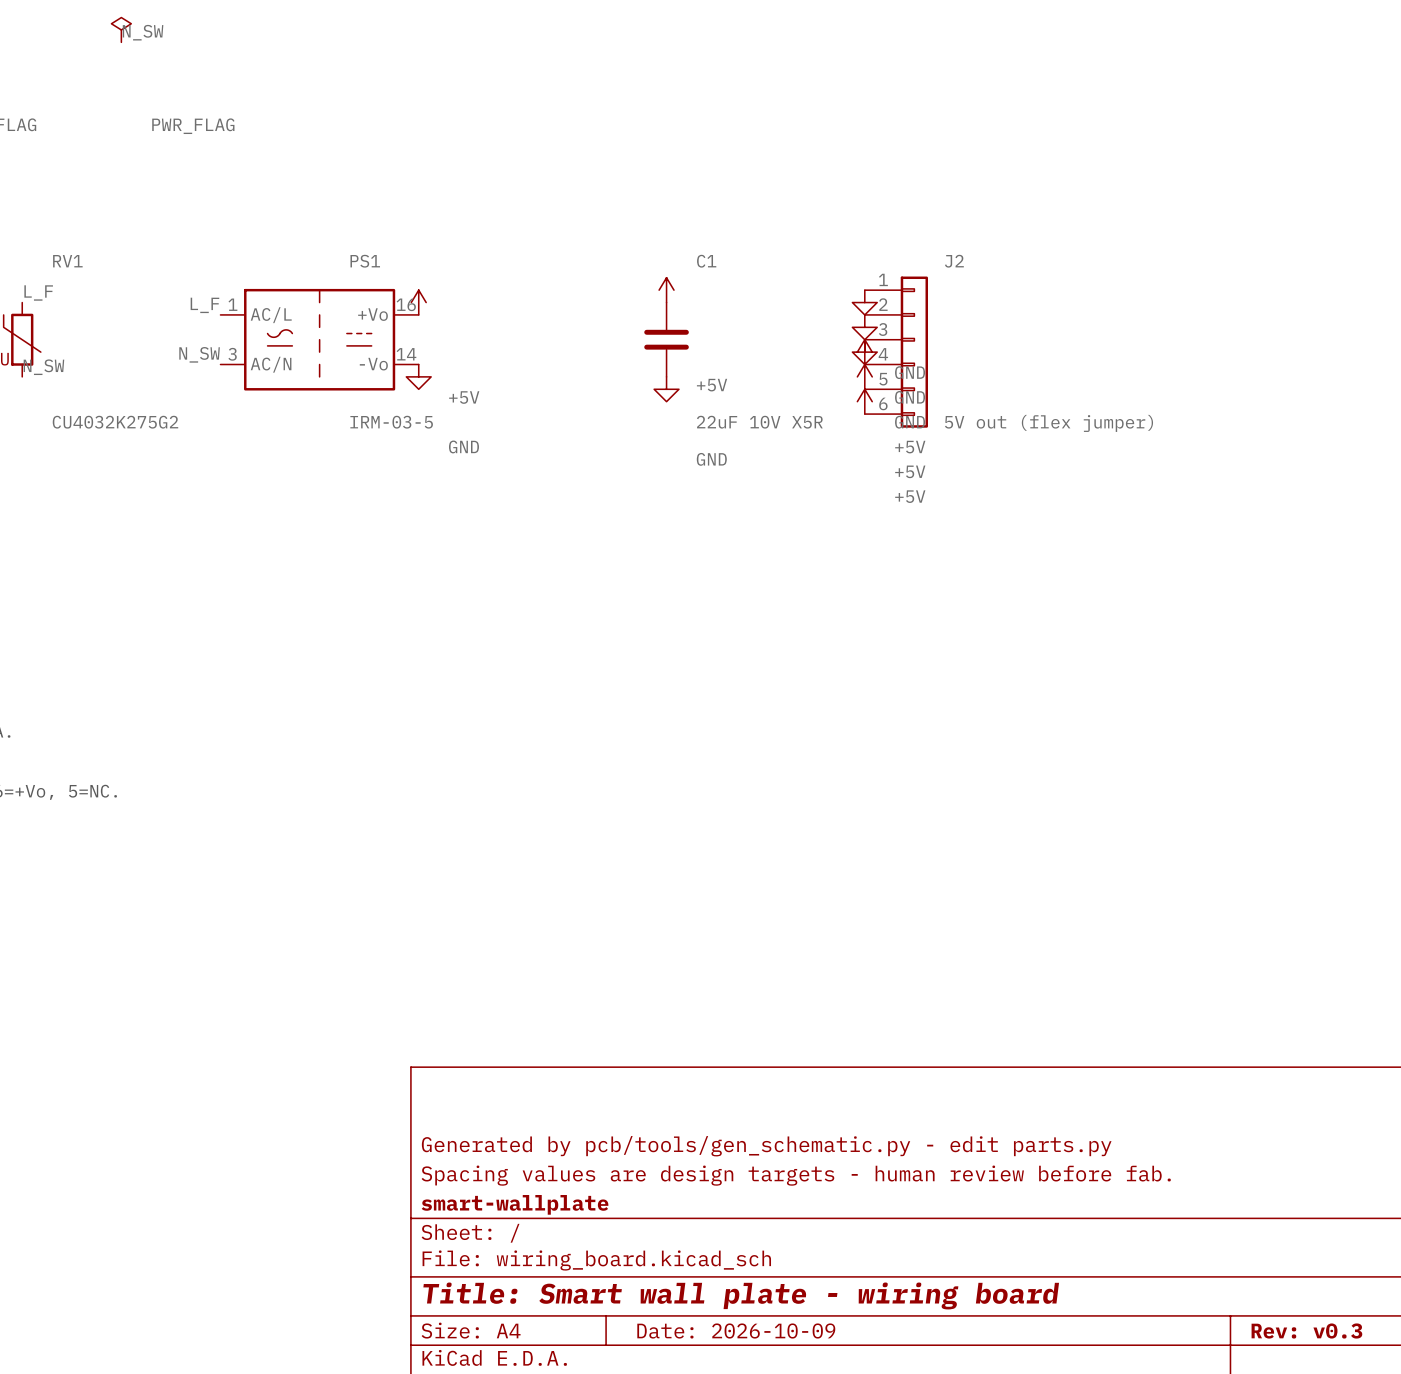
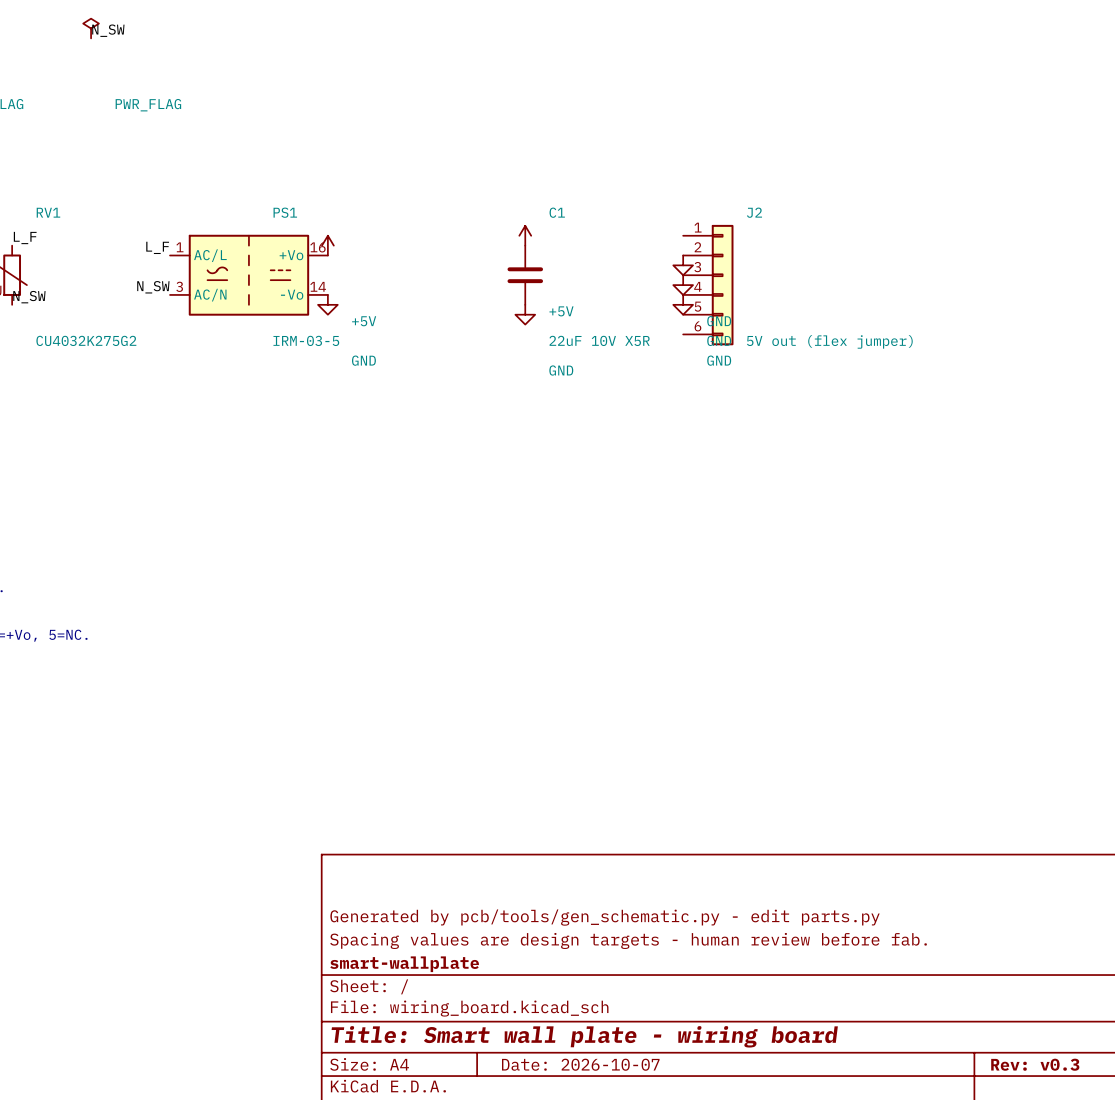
power symbol: GND (864, 302) -> none
power symbol: +5V (864, 352) -> none
power symbol: +5V (864, 376) -> GND (683, 304)
power symbol: +5V (864, 401) -> none
title block: Date: 2026-10-09 (736, 1331) -> Date: 2026-10-07 (580, 1064)

